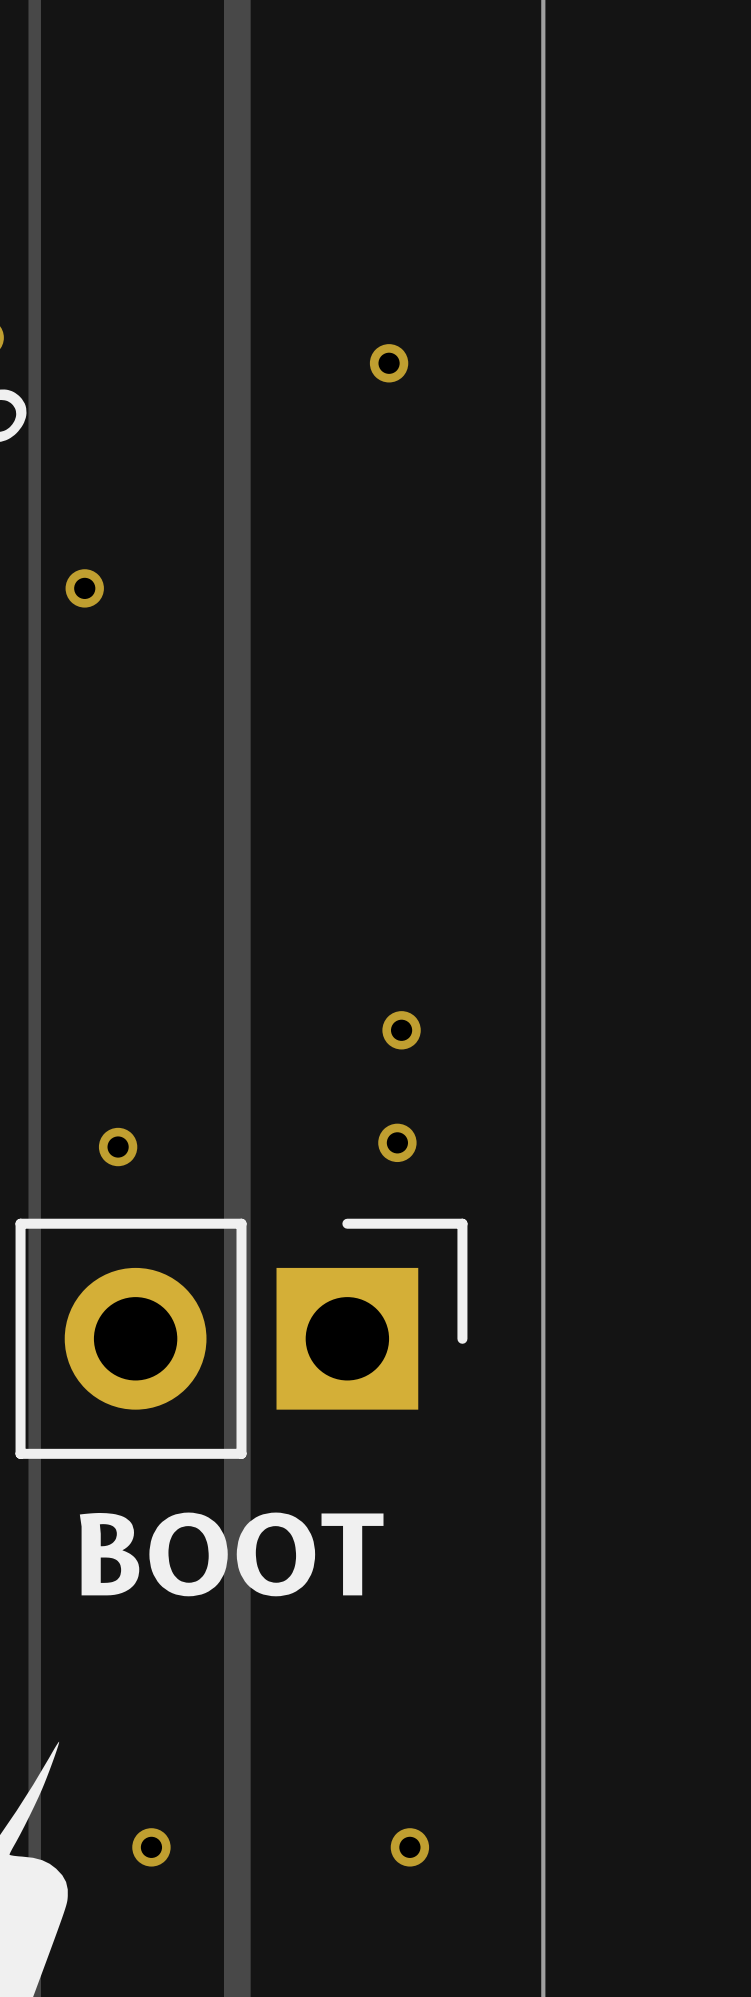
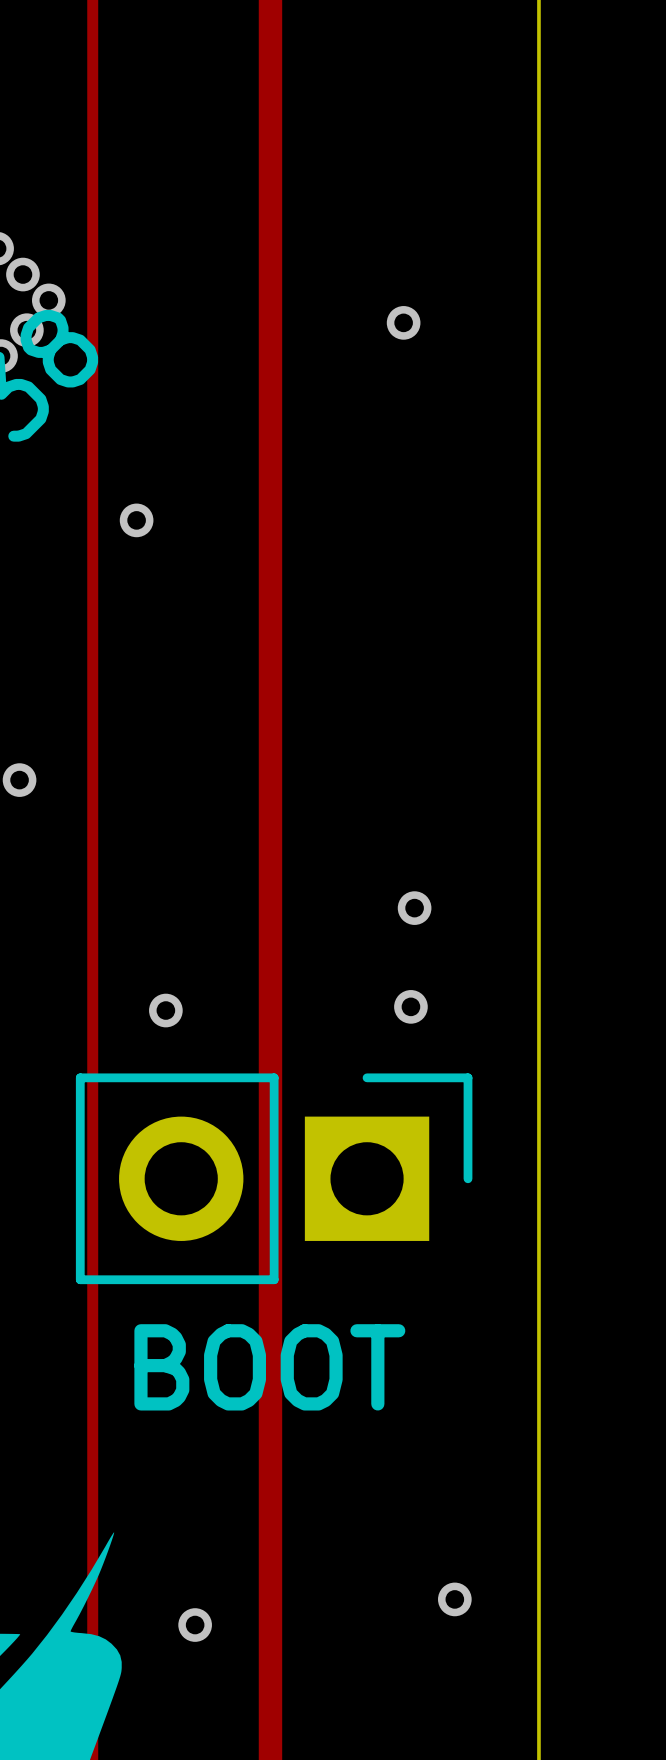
via position: (409, 1847) -> (454, 1599)

